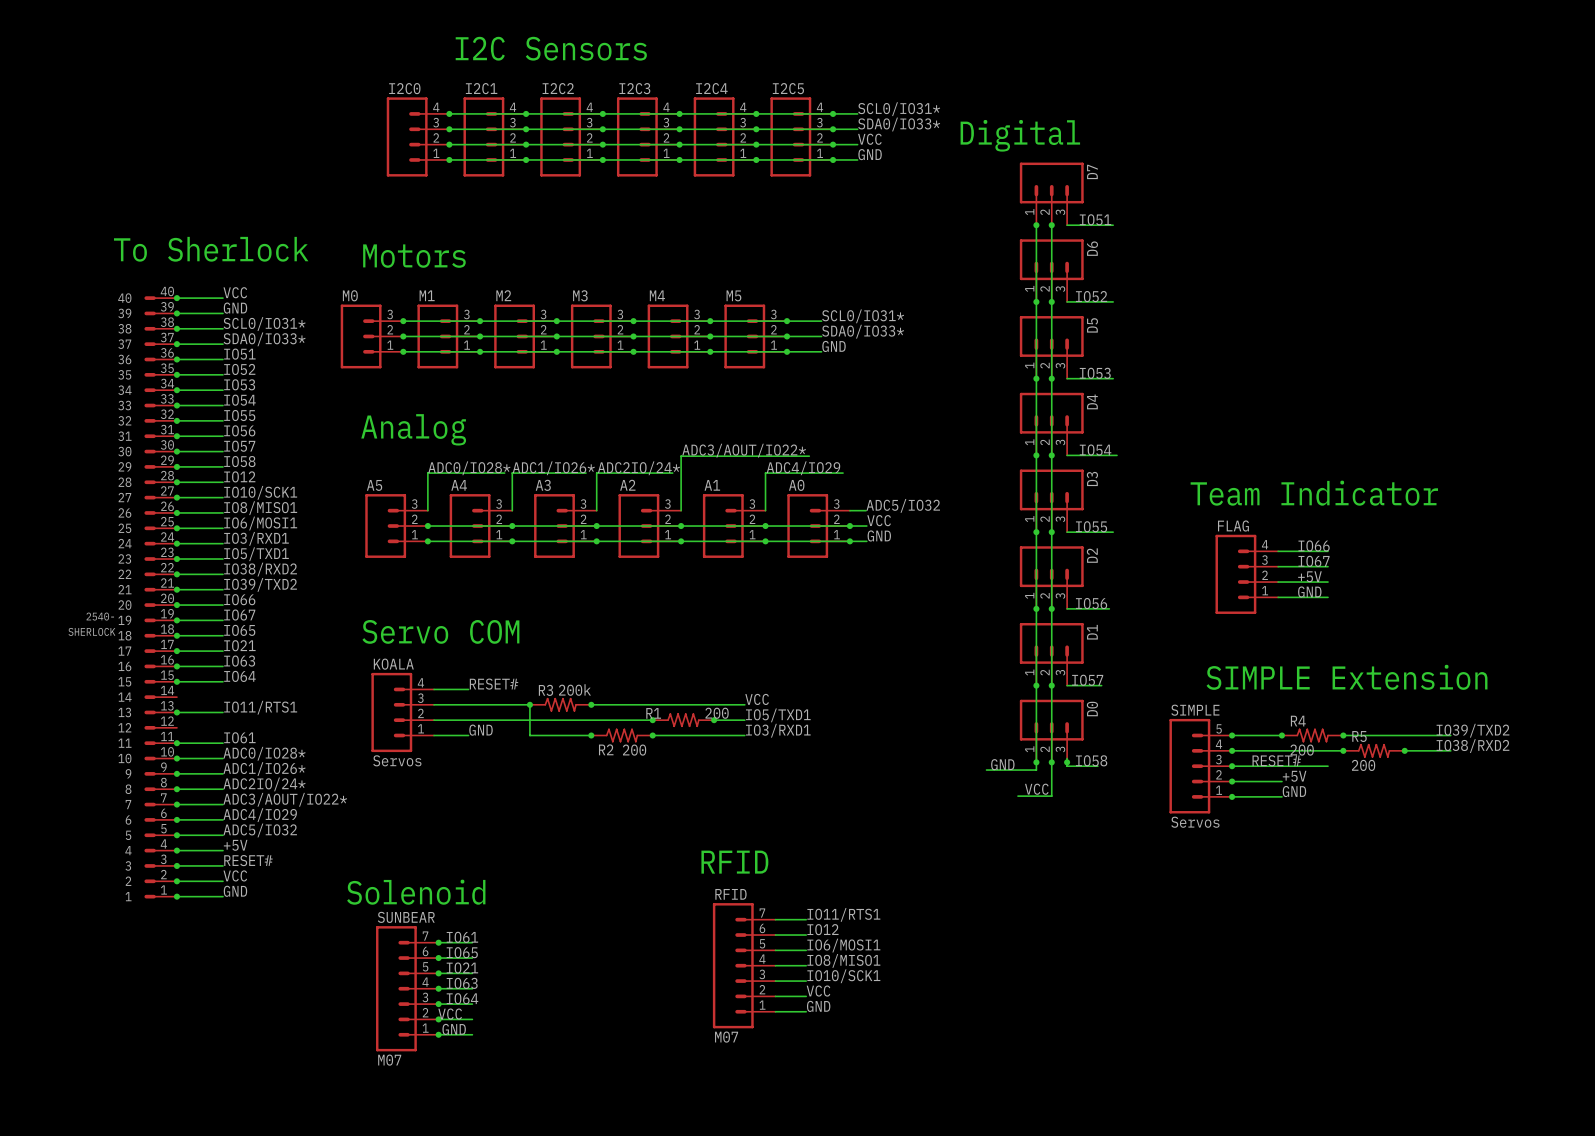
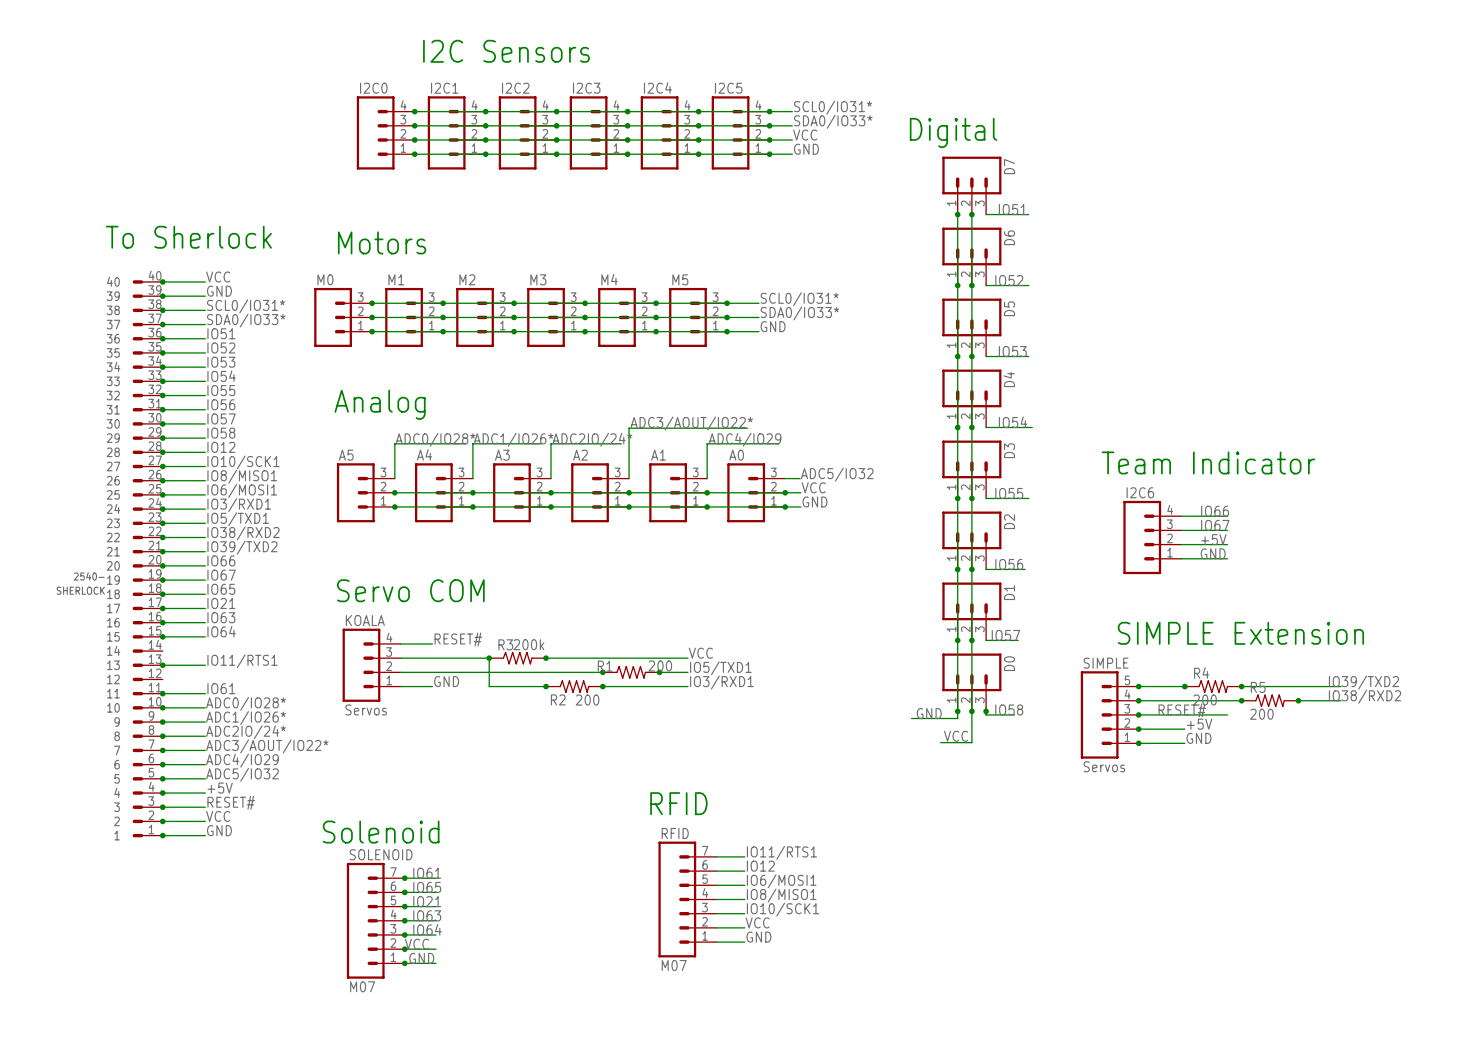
FLAG name: FLAG (1233, 526) -> I2C6 (1140, 492)
SUNBEAR name: SUNBEAR (406, 917) -> SOLENOID (381, 854)

